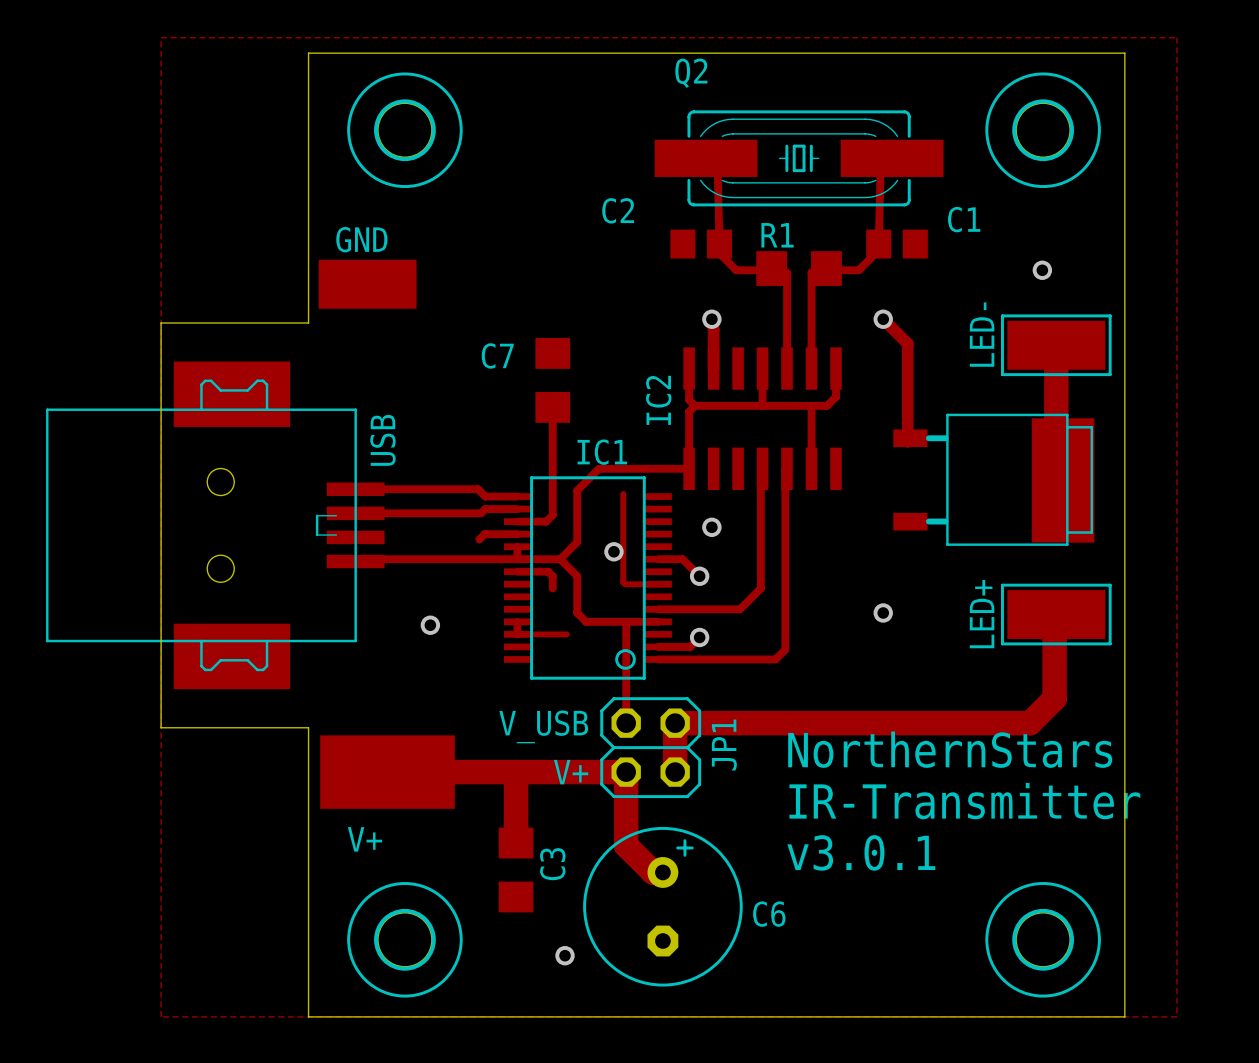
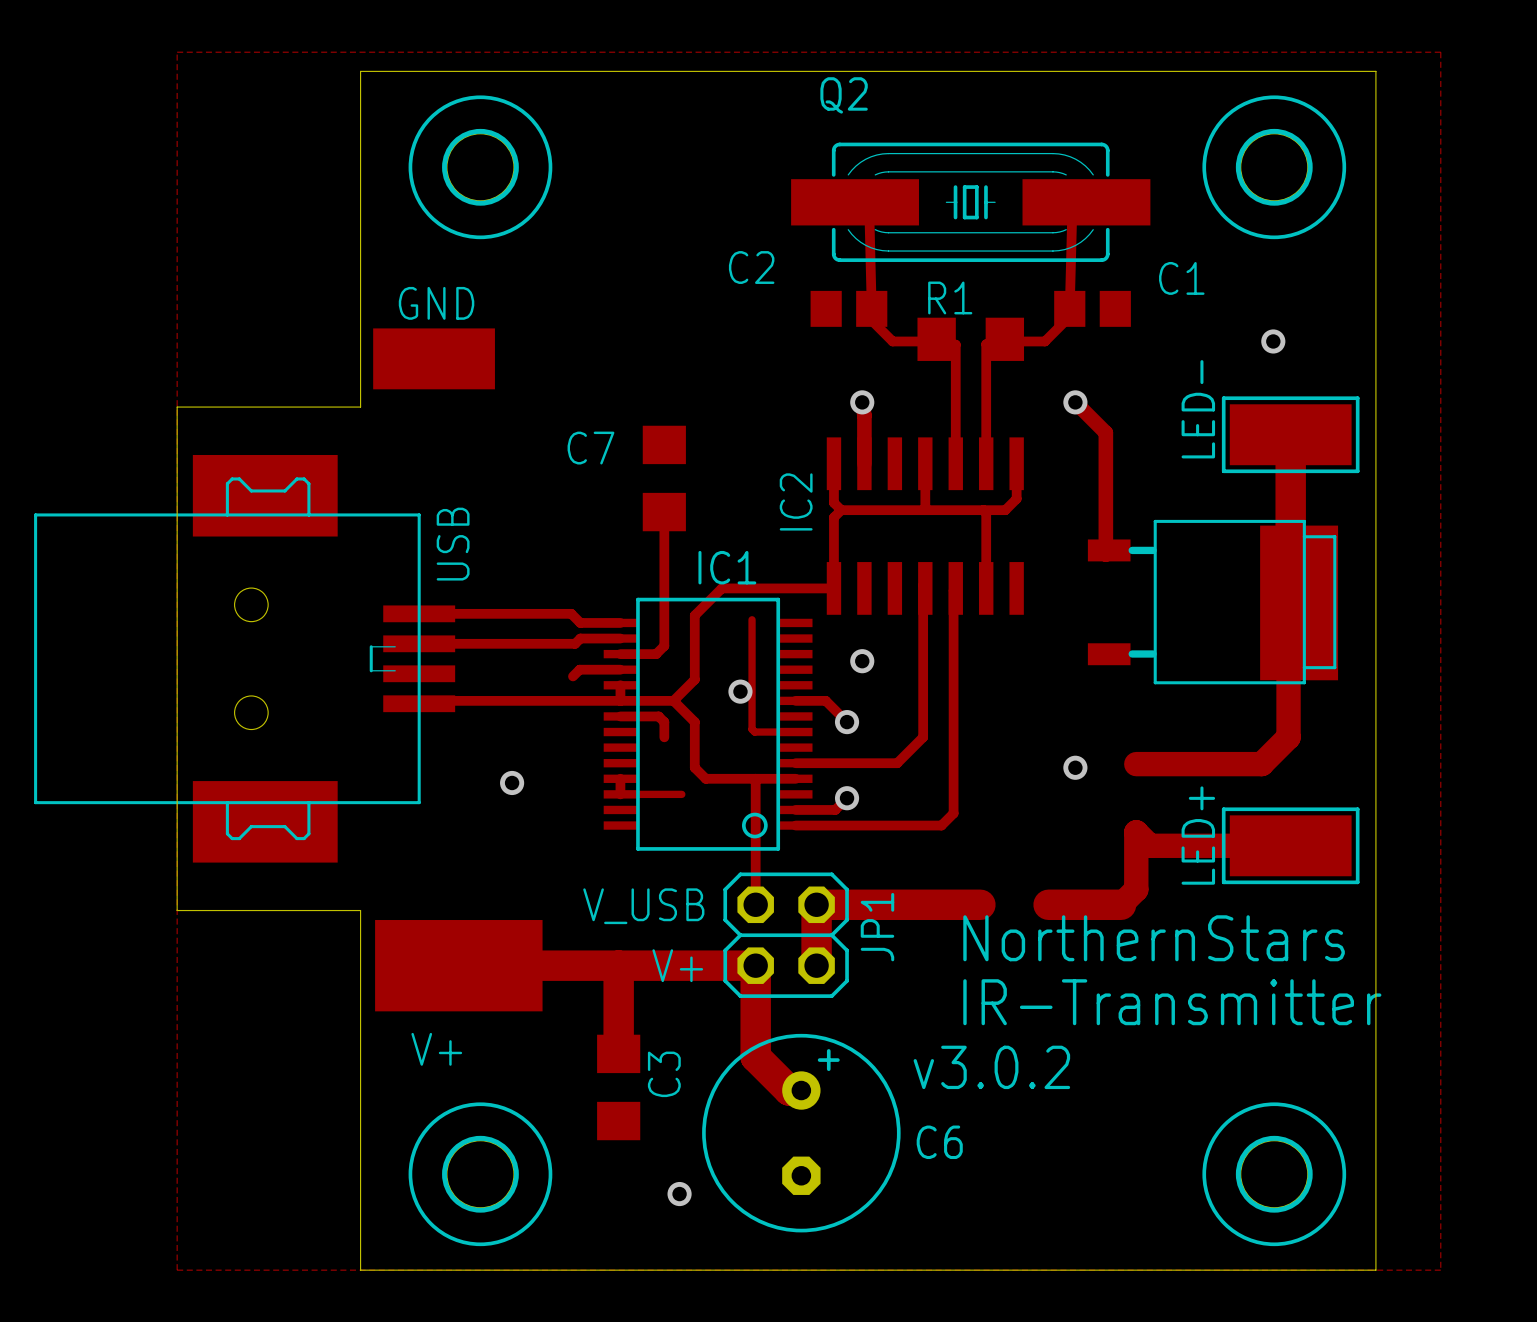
track: none -> (1299, 602) (1288, 613) (1288, 737) (1261, 764) (1136, 764)
track: (1056, 614) (1054, 616) (1054, 698) (1030, 723) (919, 723) -> (1290, 845) (1149, 845) (1136, 832) (1136, 889) (1121, 904)
LED+ position: (1056, 614) -> (1290, 845)
track: (806, 723) (861, 723) -> none
text: v3.0.1 (861, 852) -> v3.0.2 (991, 1067)

